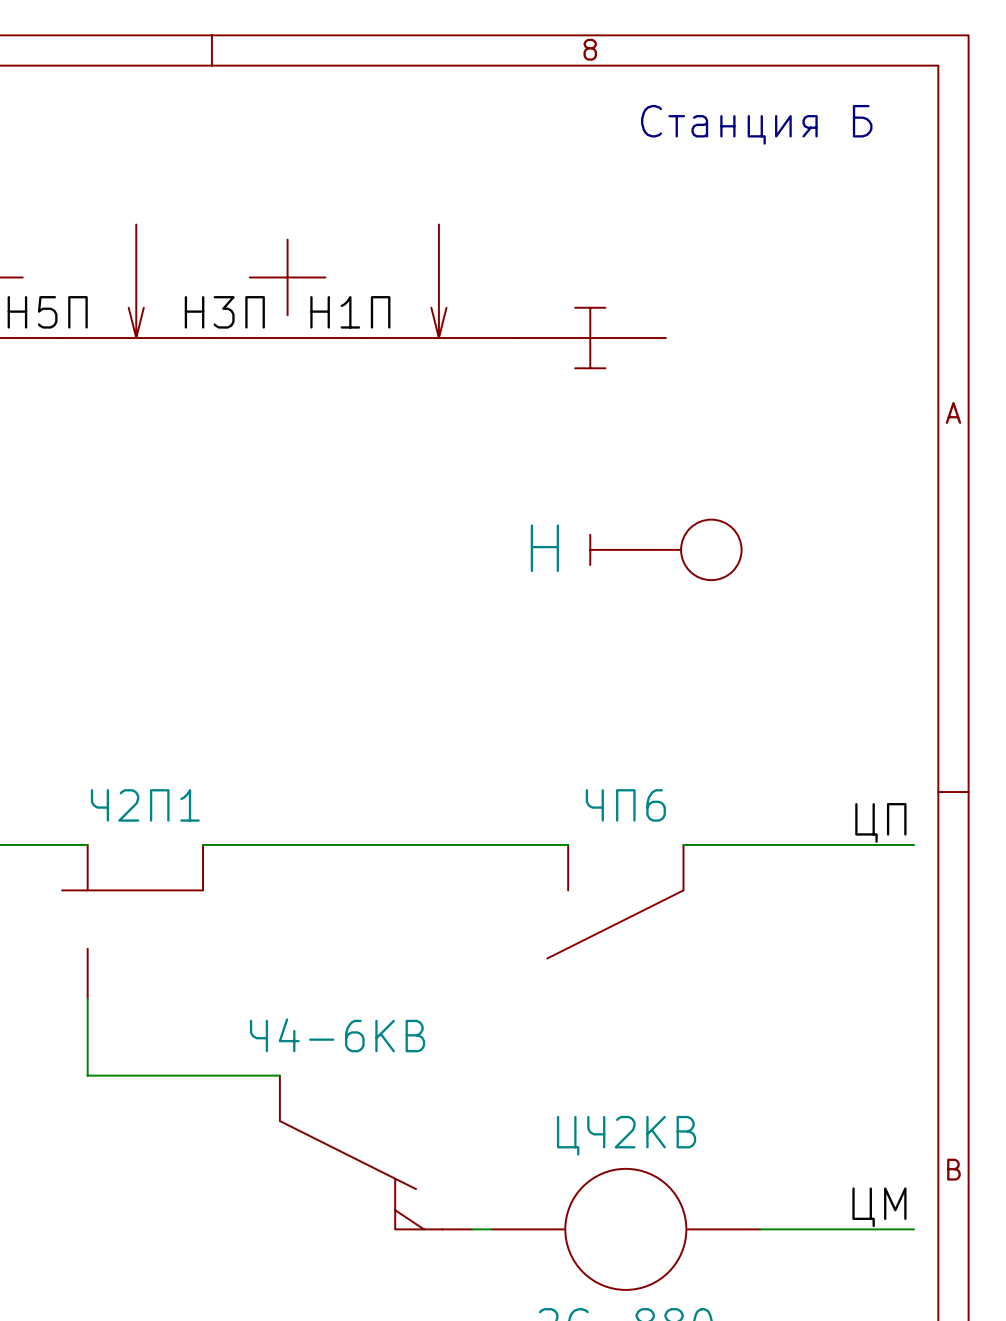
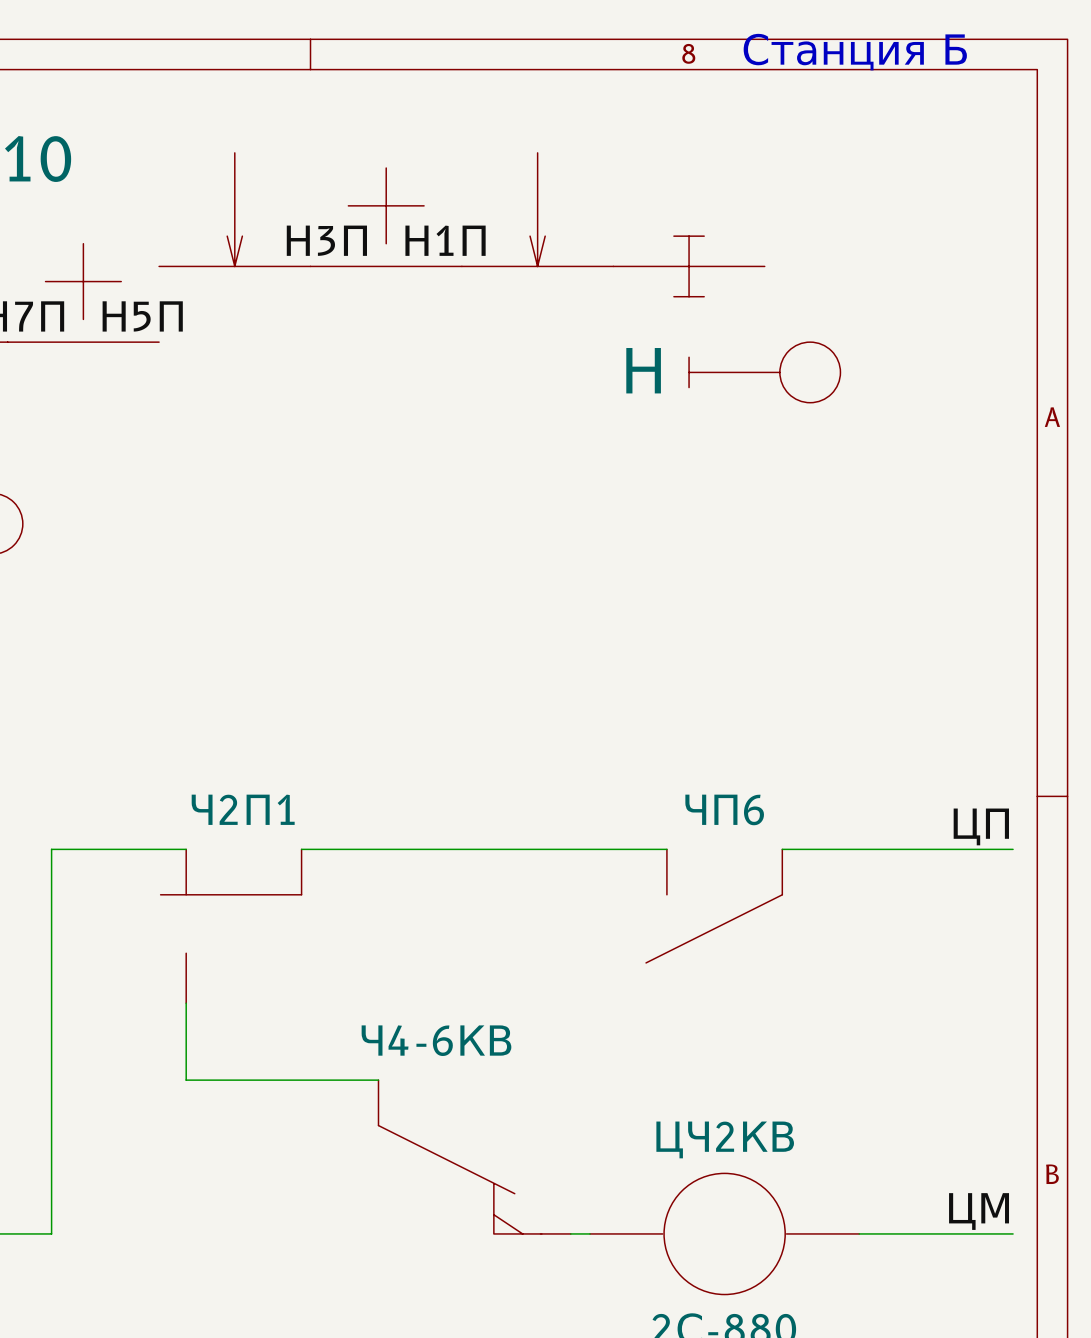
text position: Станция Б (756, 124) -> Станция Б (855, 52)
part position: (136, 281) -> (234, 209)
part position: (438, 281) -> (537, 209)
part position: (287, 288) -> (386, 217)
label position: Н3П (224, 312) -> Н3П (326, 240)
label position: Н1П (350, 312) -> Н1П (445, 240)
part position: (590, 338) -> (689, 266)
part position: (665, 549) -> (764, 372)

